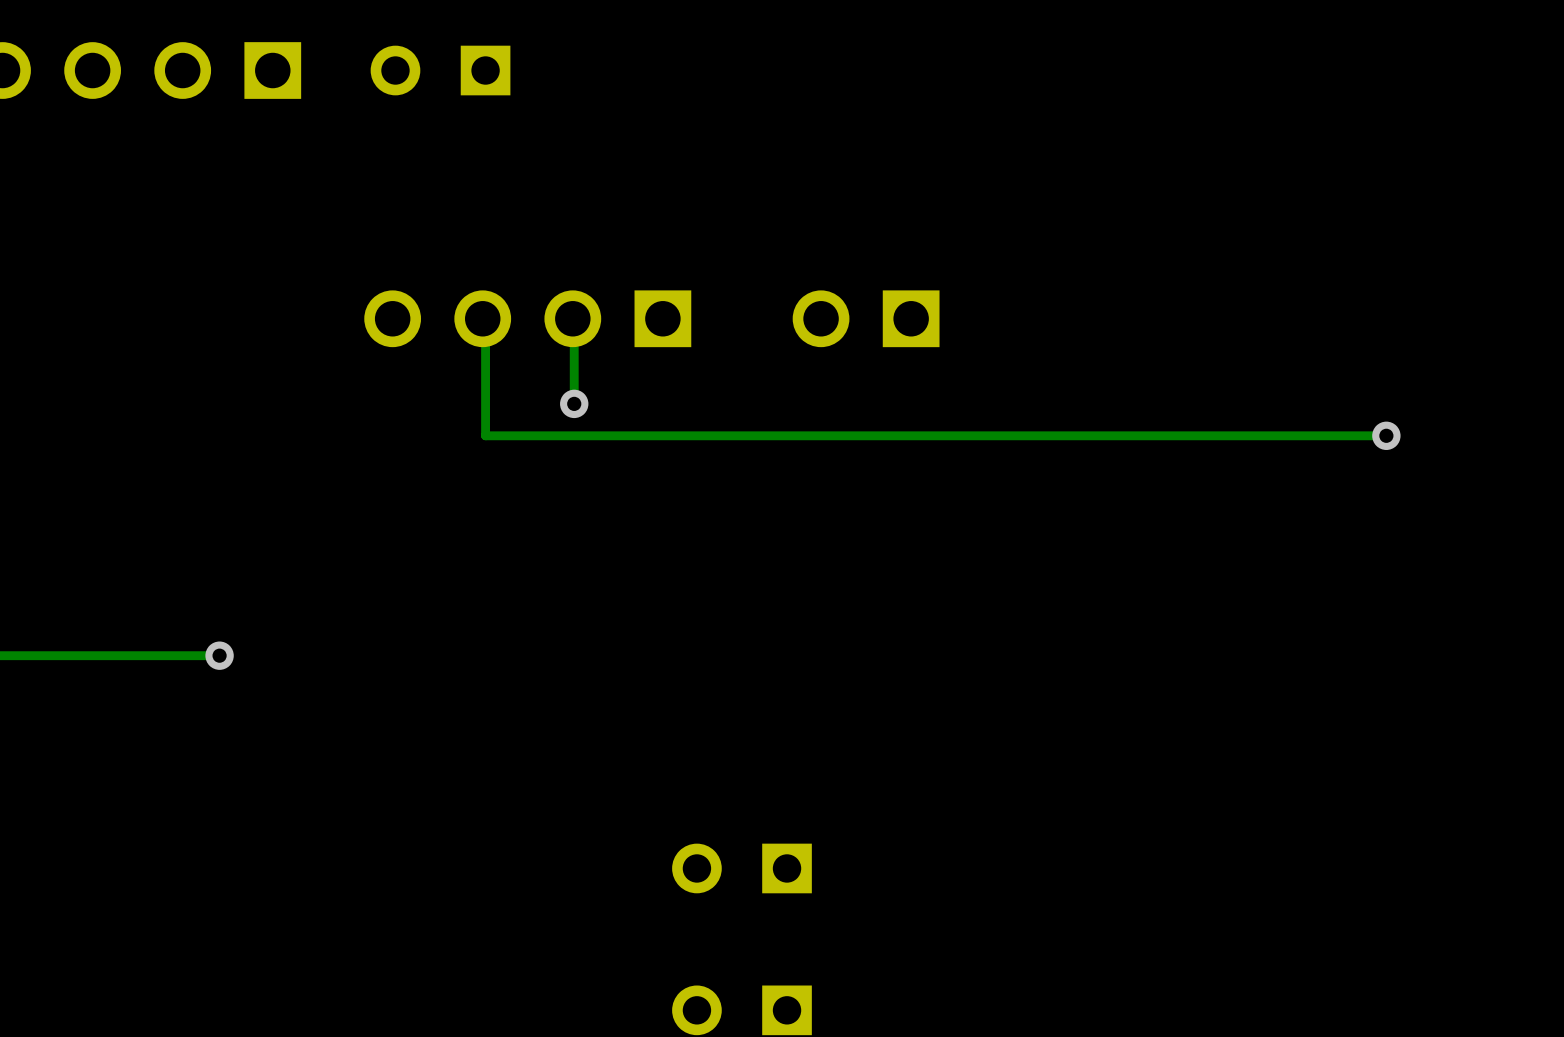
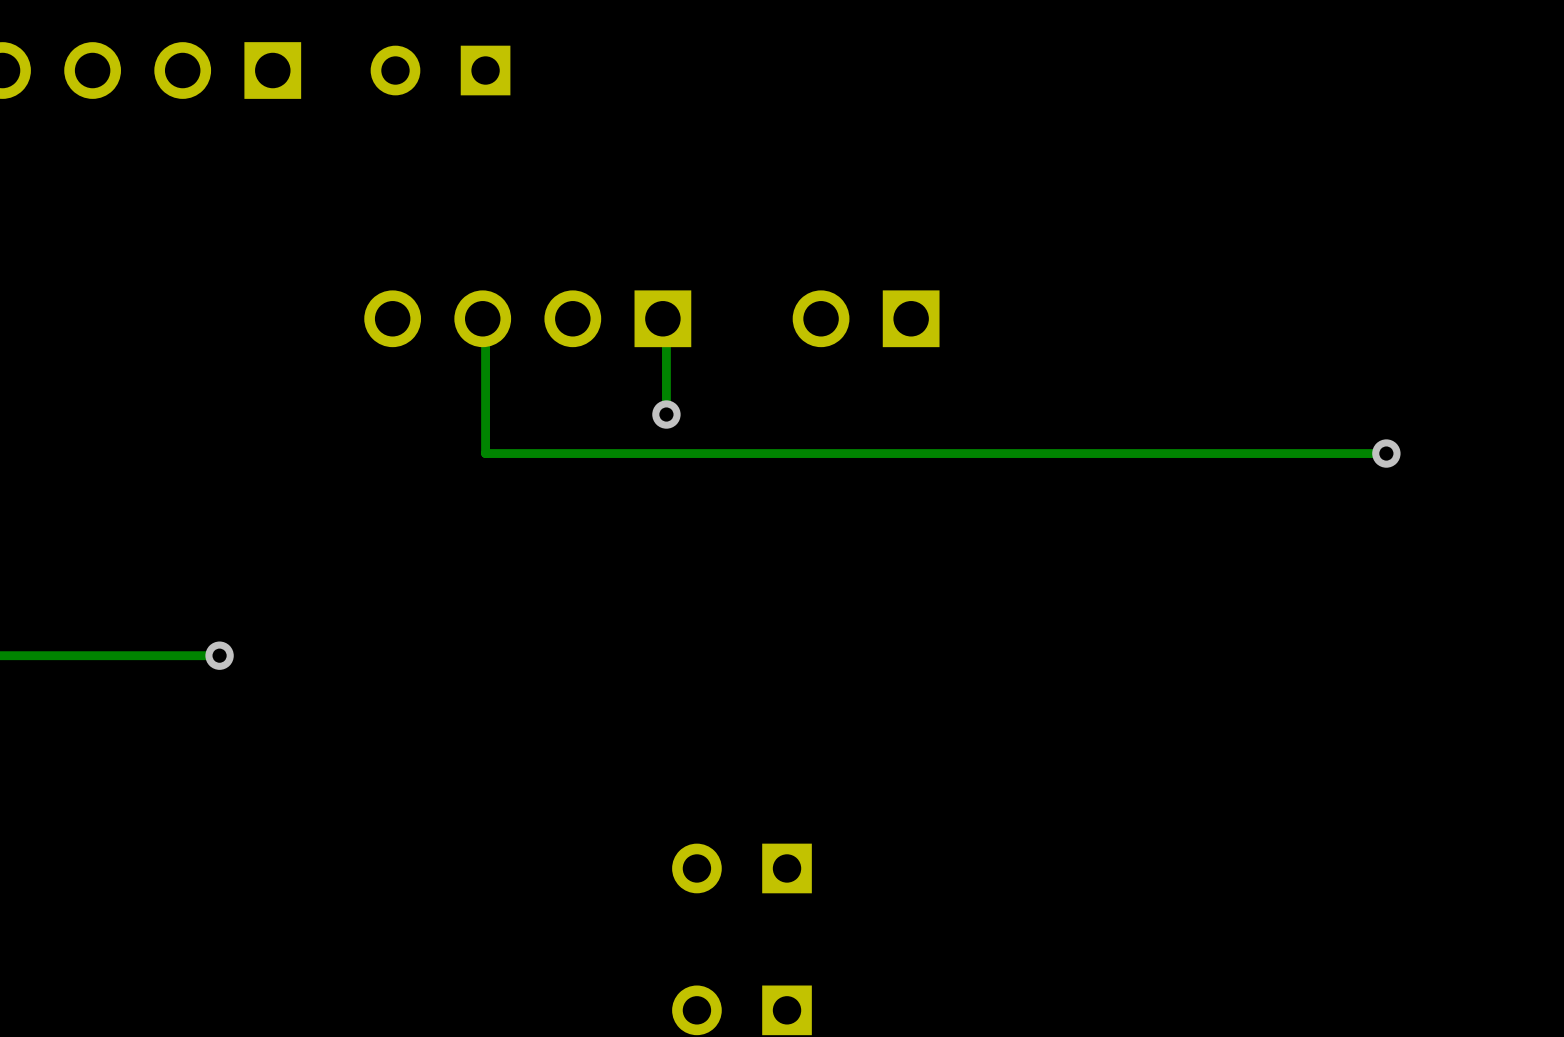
track: (574, 322) (574, 403) -> none
track: none -> (666, 322) (666, 414)
via position: (574, 403) -> (666, 414)
track: (1386, 435) (485, 435) -> (1386, 453) (485, 453) (485, 435)
via position: (1386, 435) -> (1386, 453)

